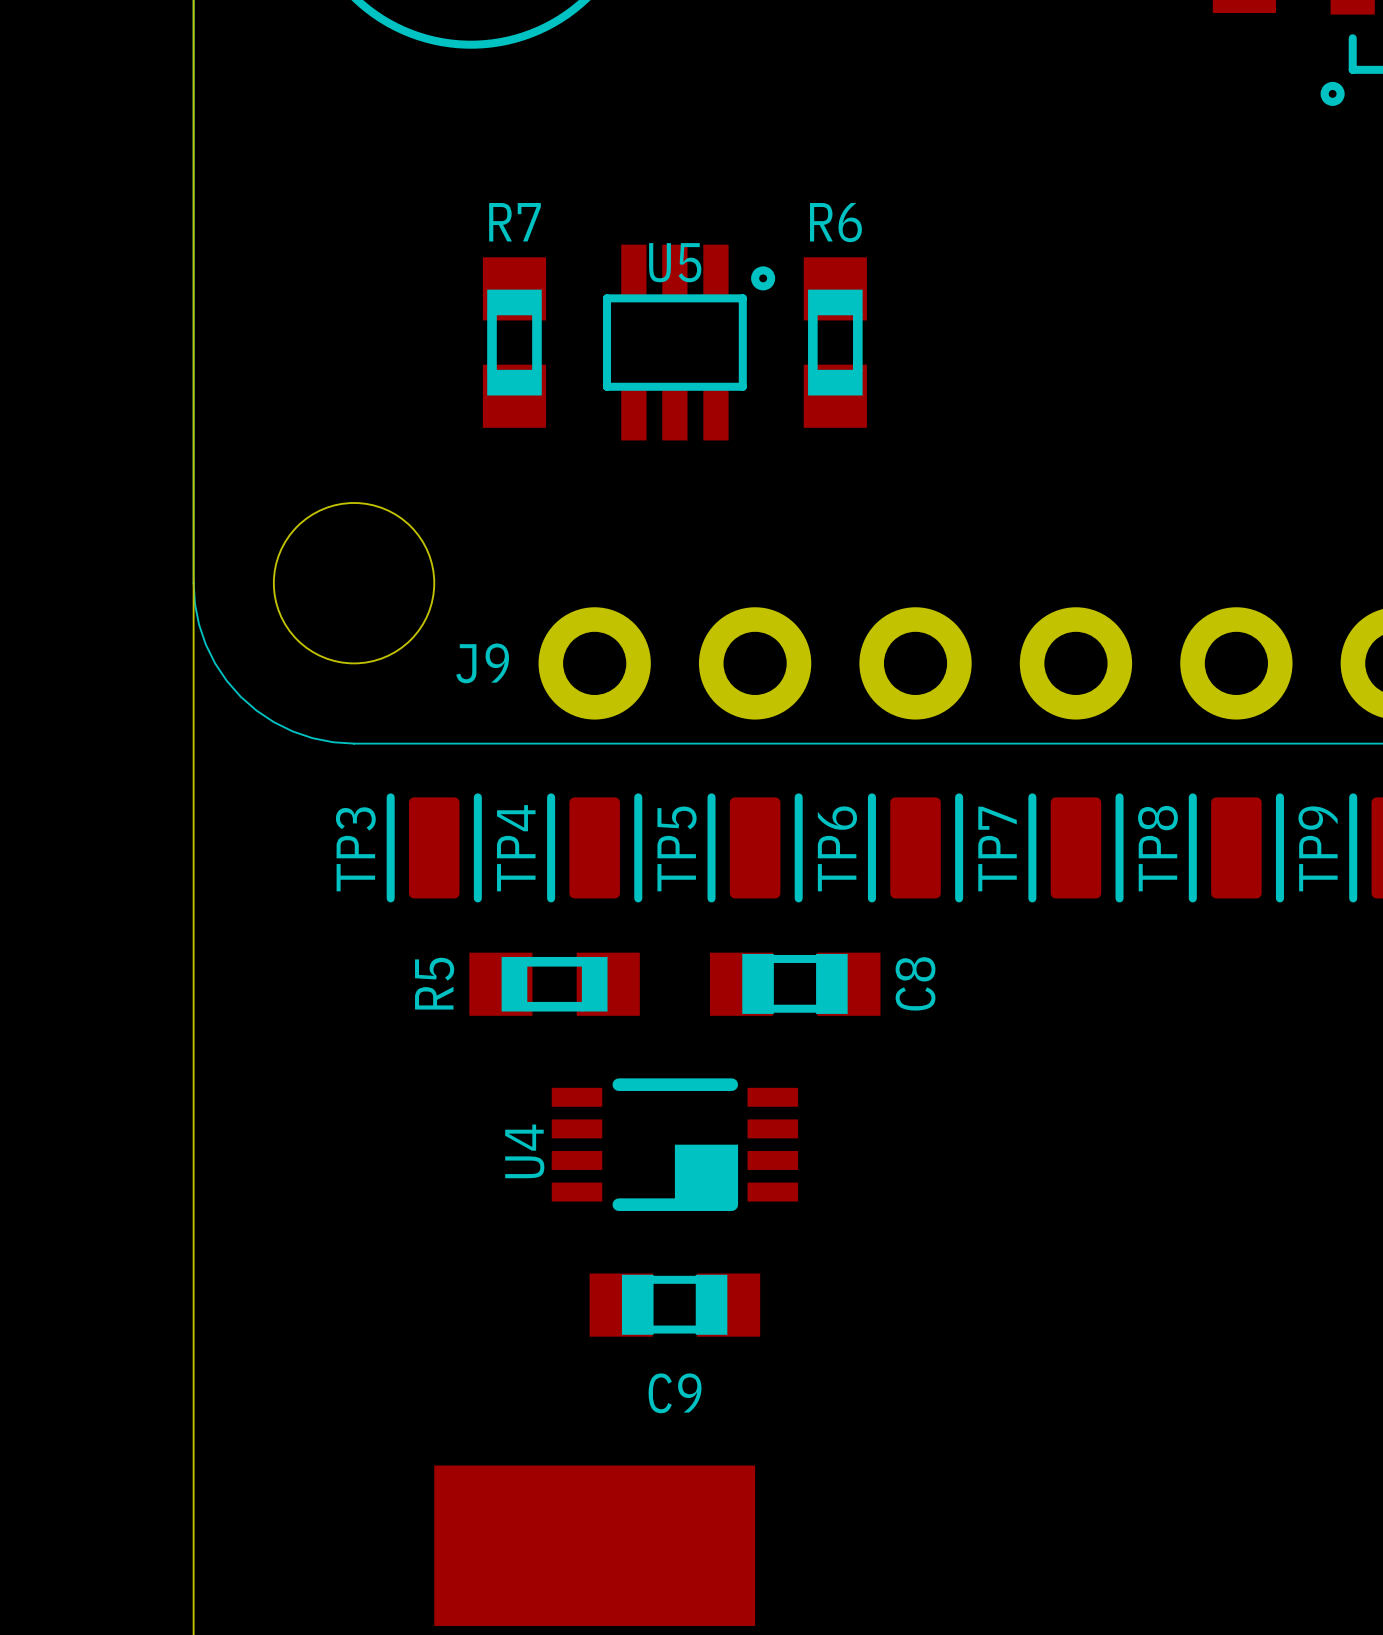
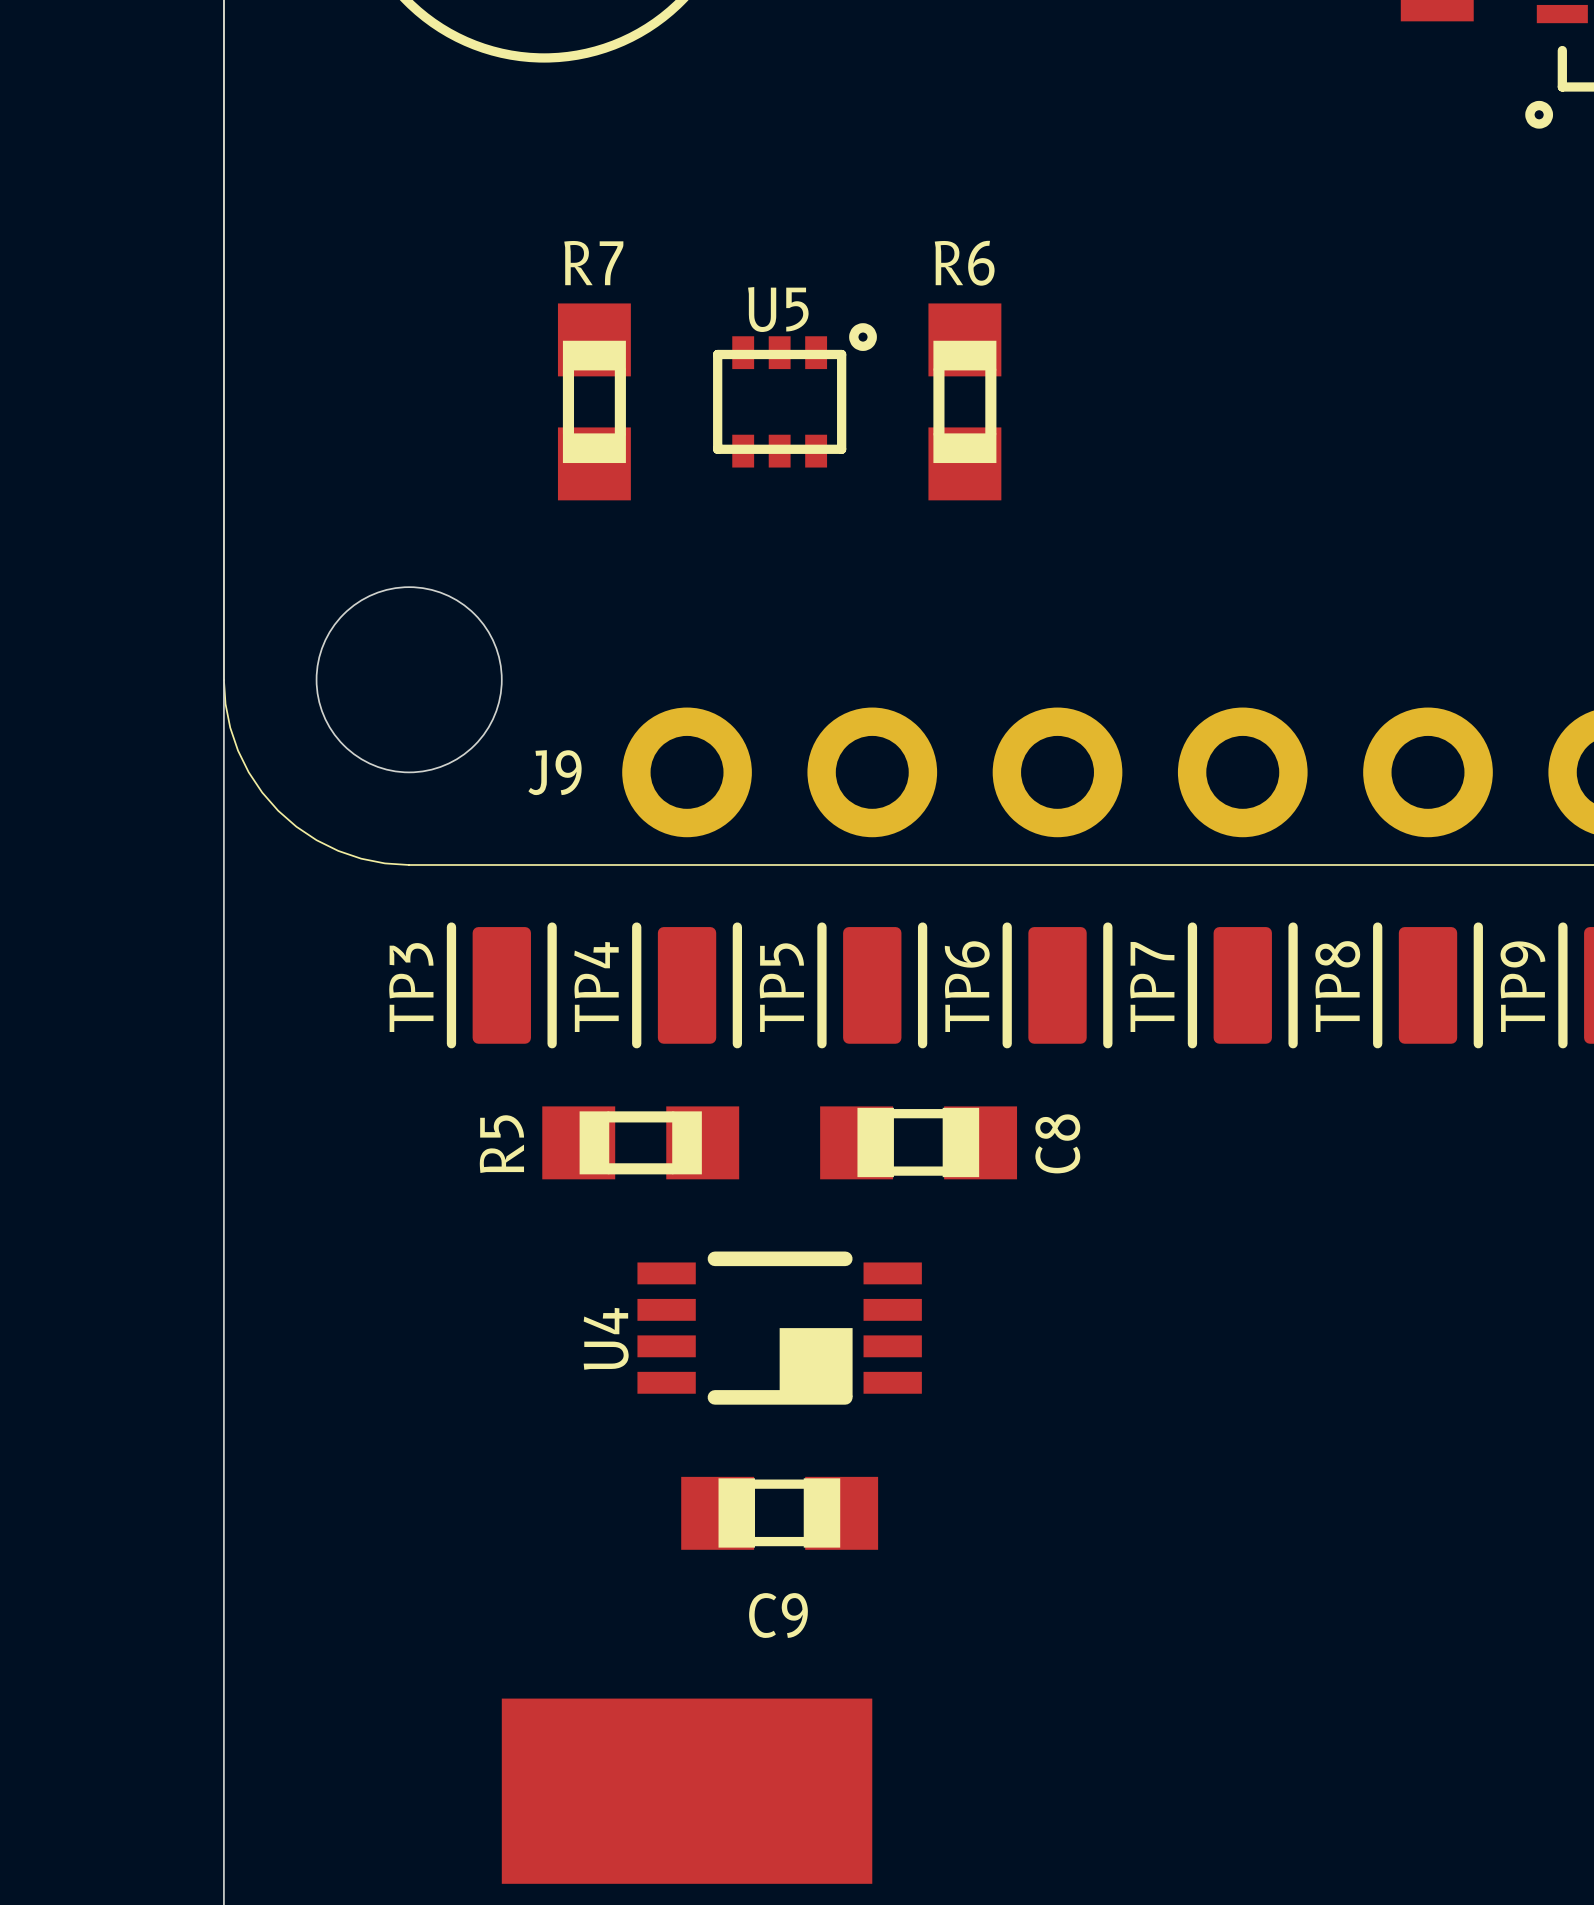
U5 footprint: [602, 244, 776, 441] -> [713, 323, 877, 468]

